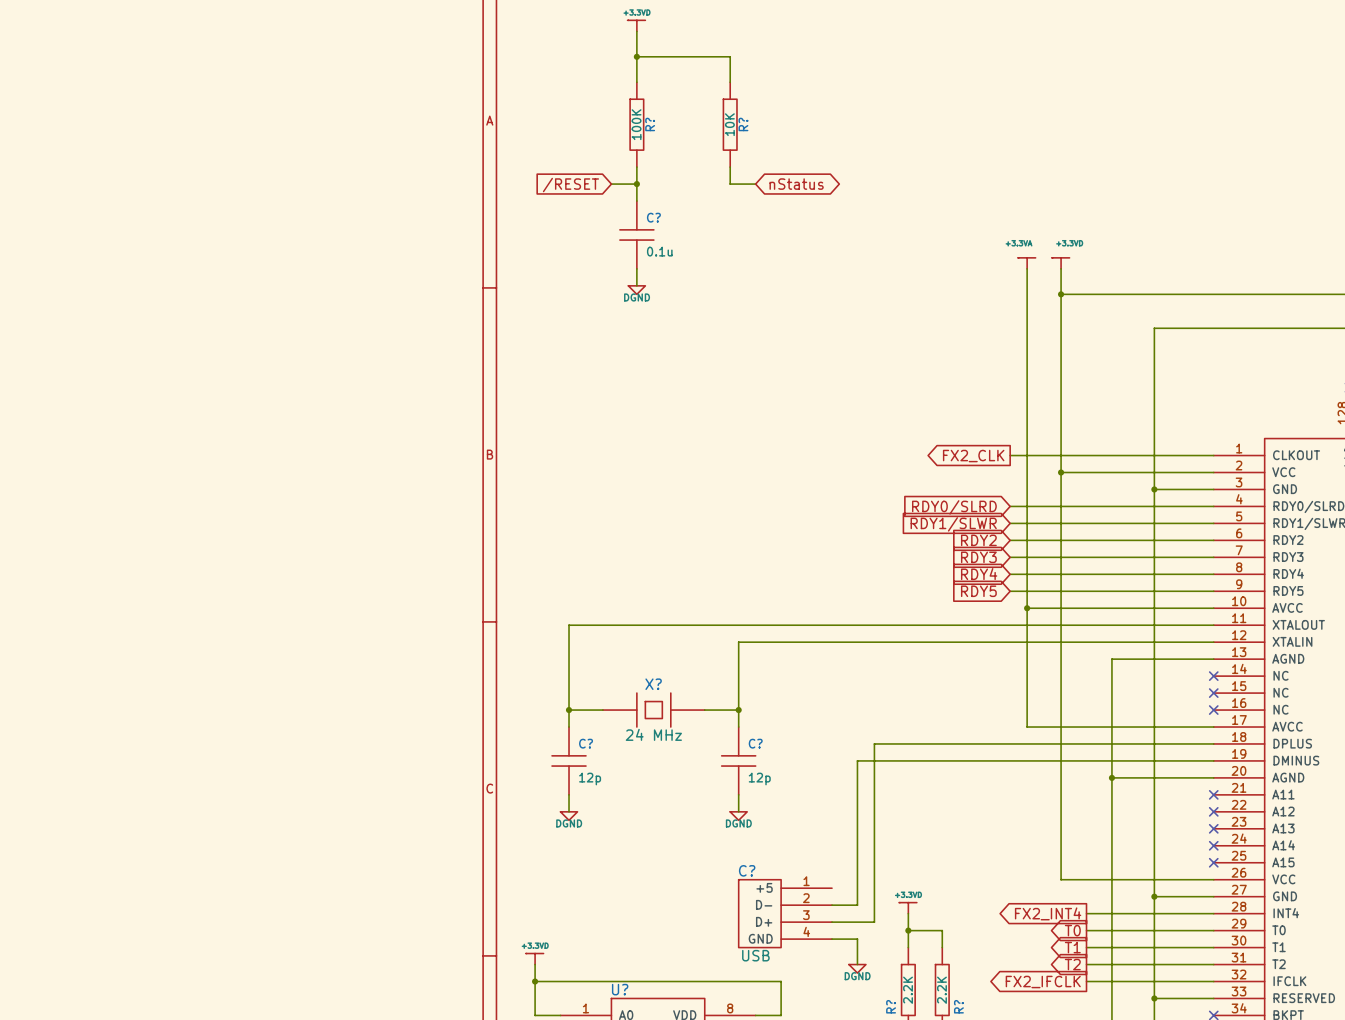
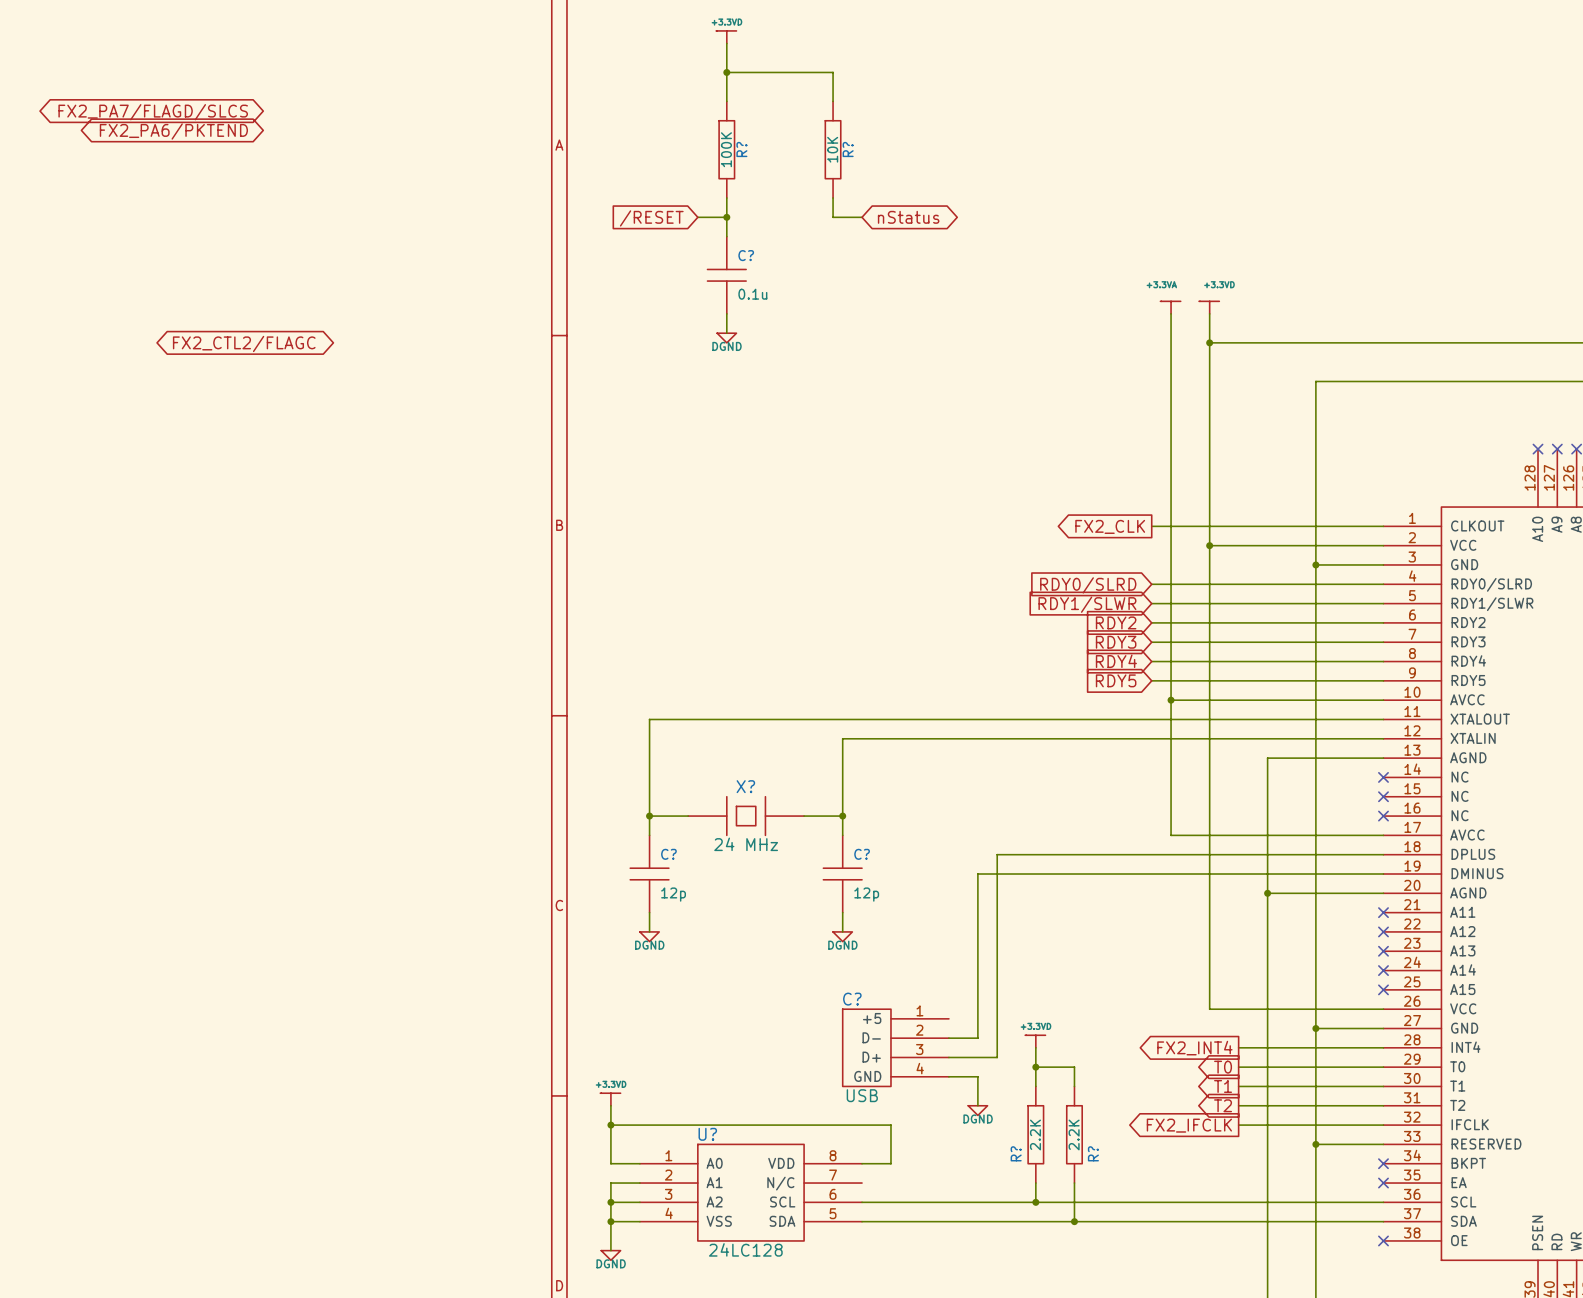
global label: none -> FX2_PA7/FLAGD/SLCS (153, 112)
global label: none -> FX2_PA6/PKTEND (173, 131)
global label: none -> FX2_CTL2/FLAGC (244, 343)

